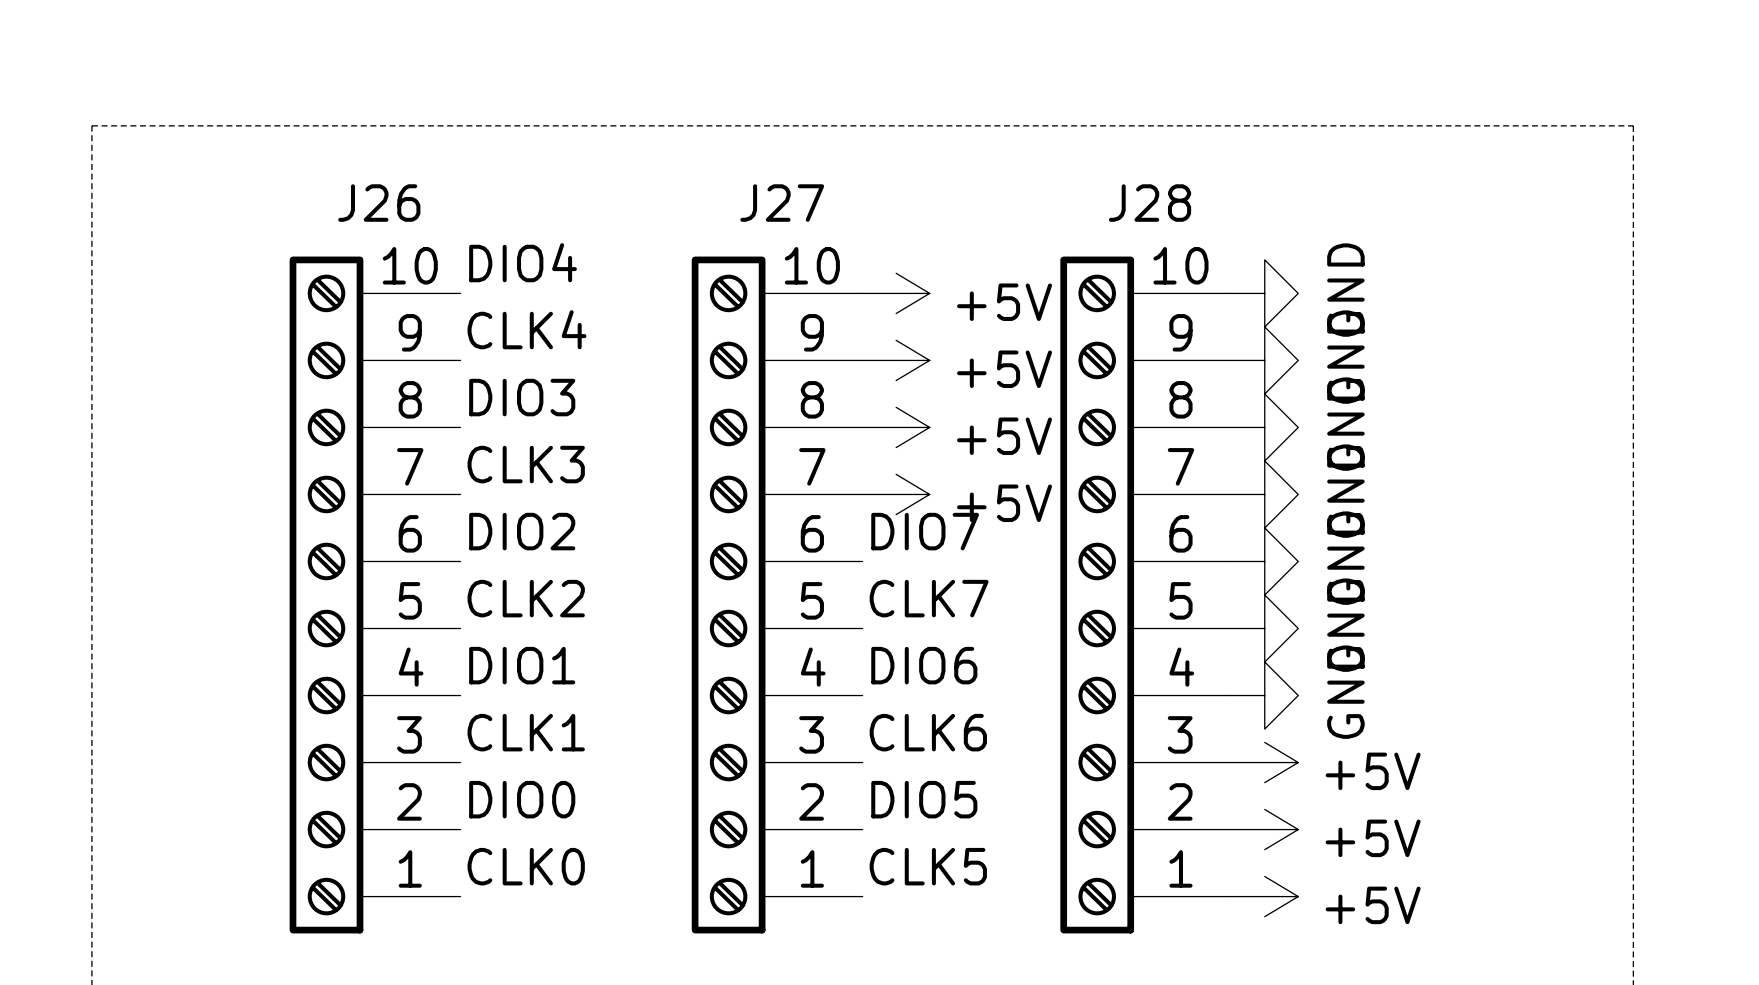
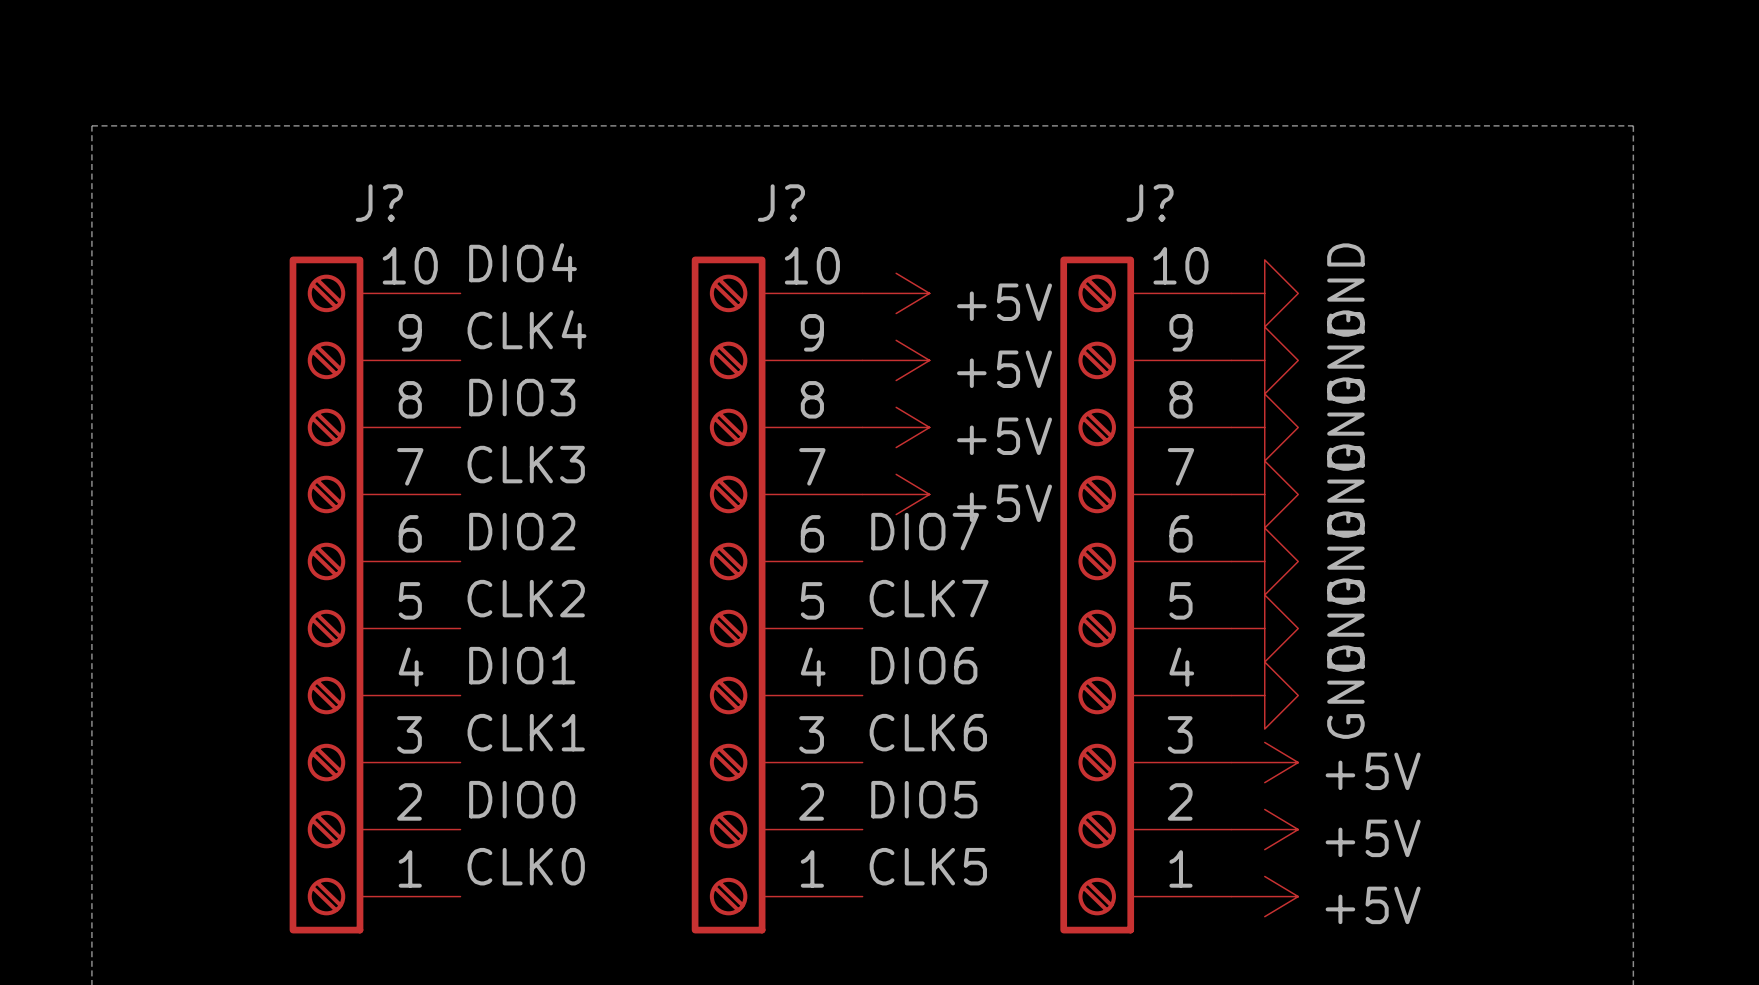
J26 name: J26 (379, 203) -> J? (379, 203)
J27 name: J27 (782, 203) -> J? (781, 203)
J28 name: J28 (1150, 203) -> J? (1150, 203)

